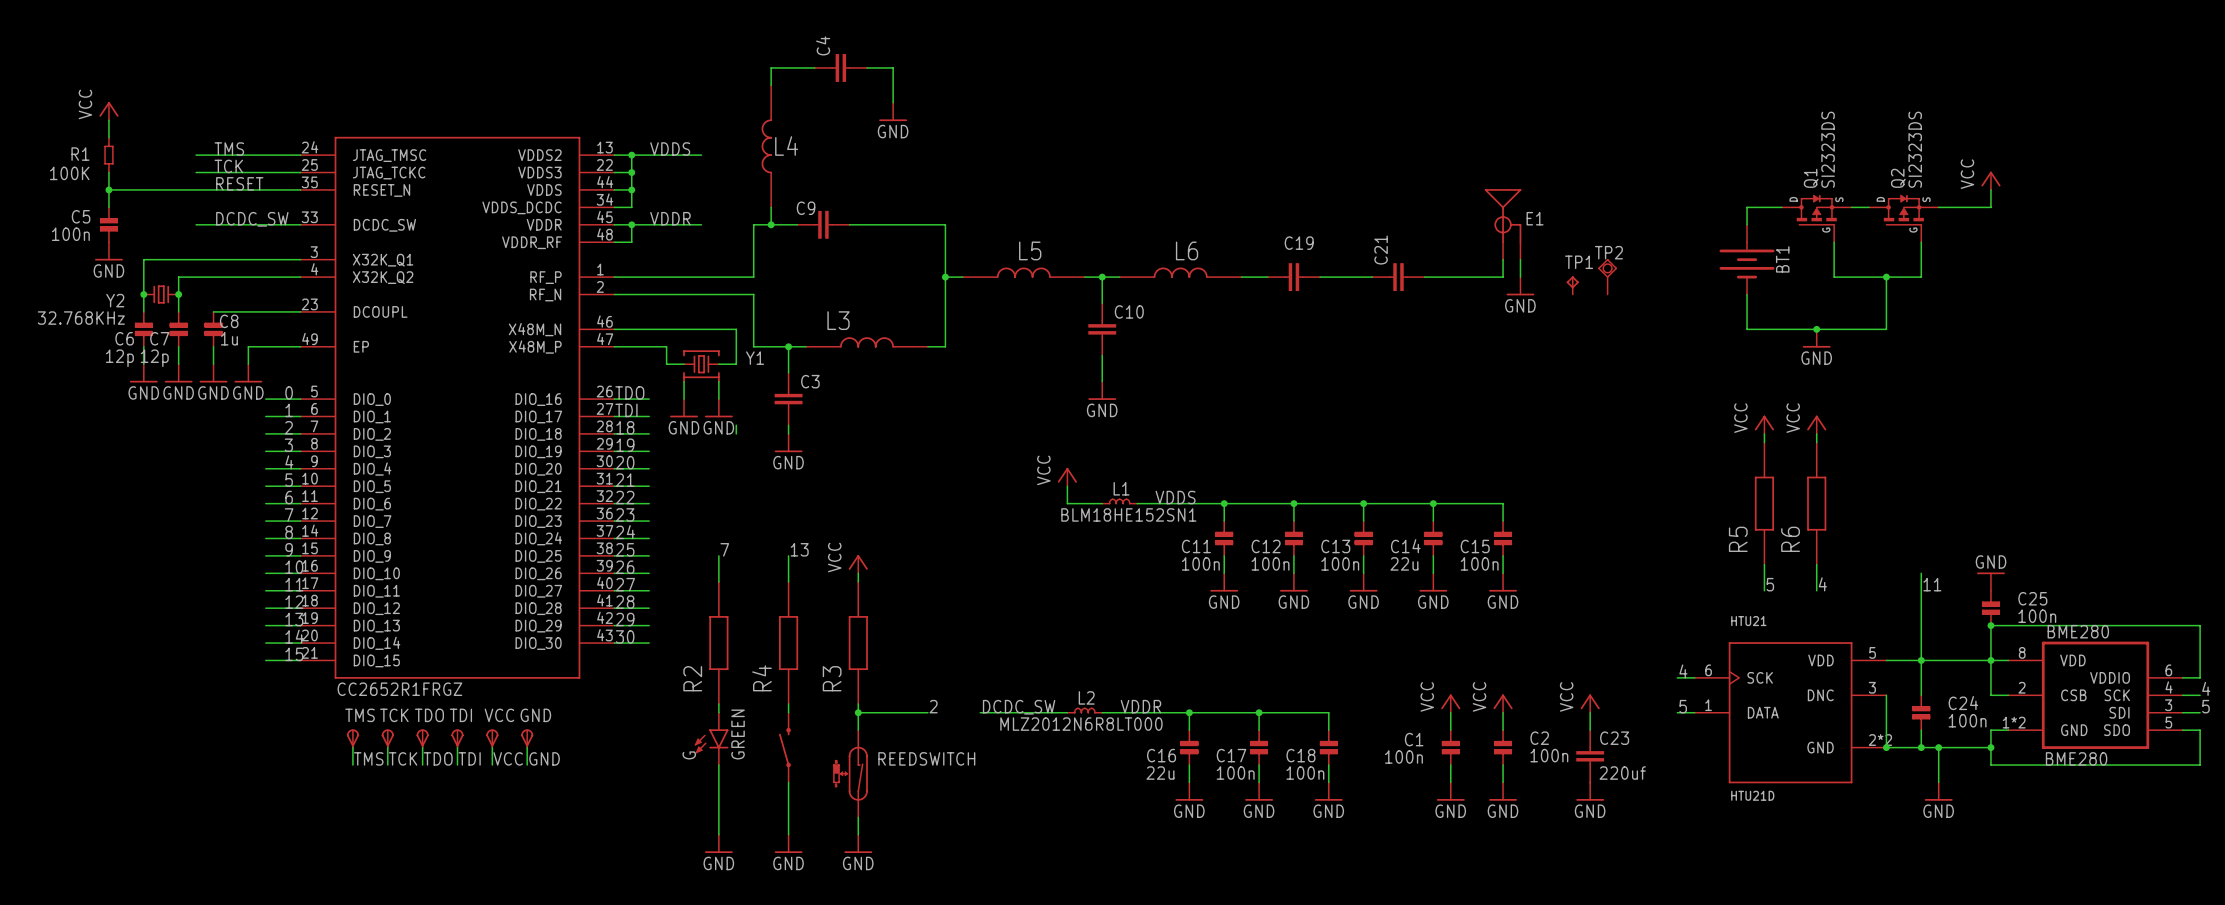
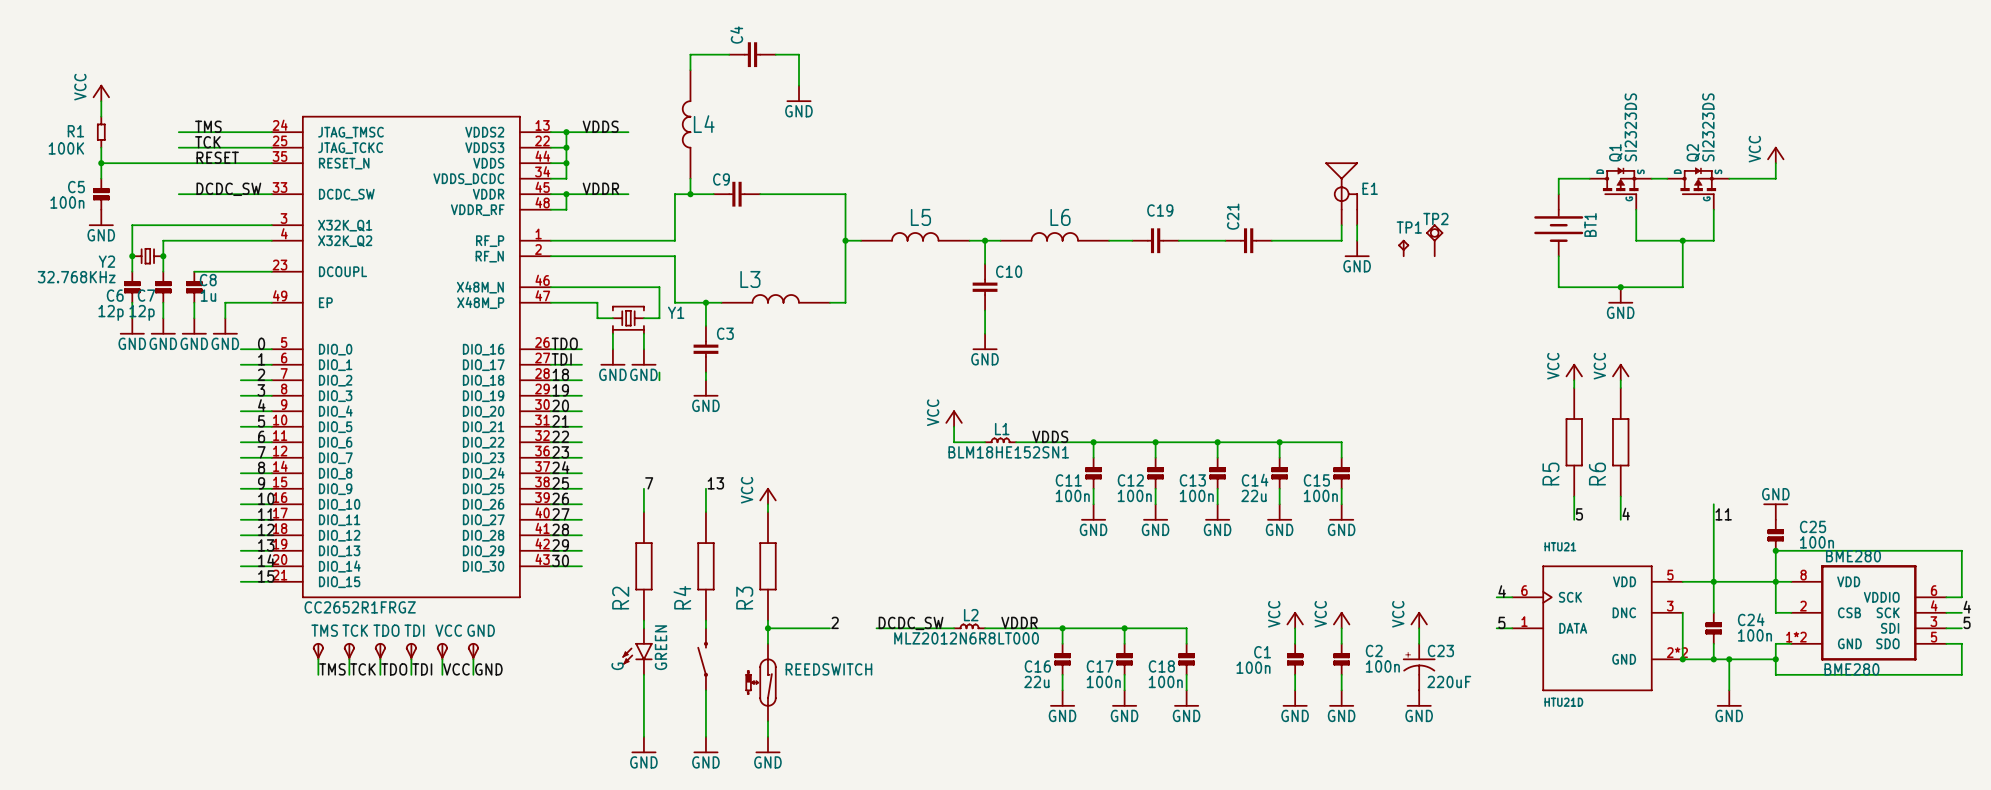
C23 symbol: [1576, 730, 1605, 783] -> [1402, 643, 1436, 691]
C23 value: 220uf (1622, 773) -> 220uF (1449, 681)

